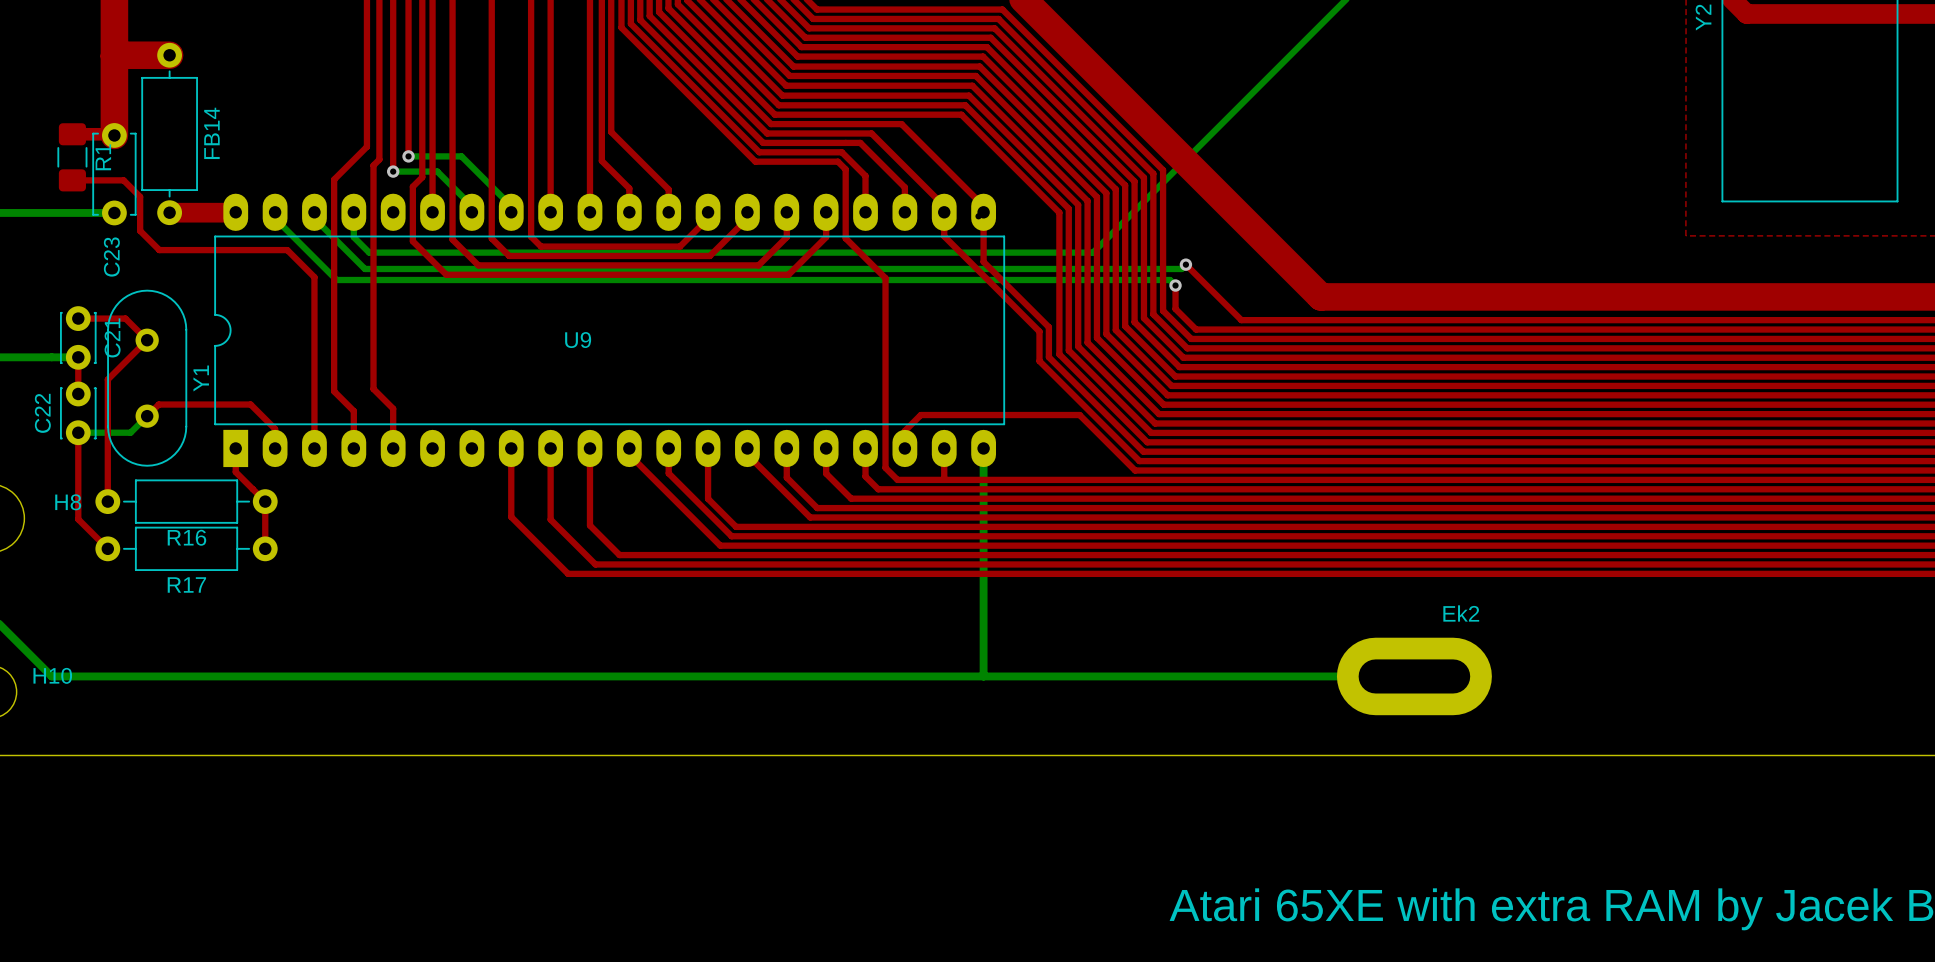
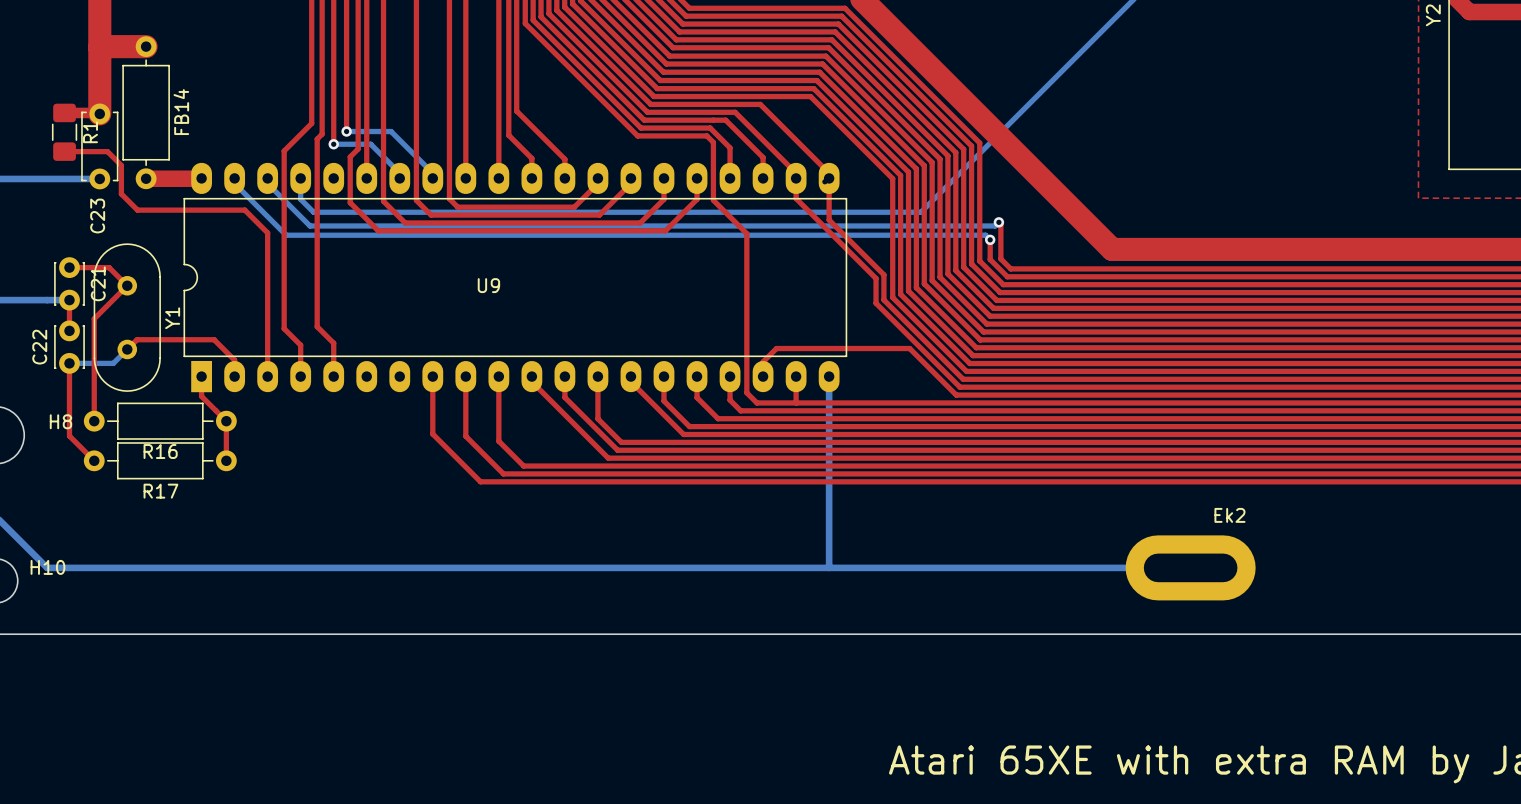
top track: (1188, 267) (1241, 320) -> (1000, 224) (1000, 259) (1010, 268) (1045, 268)

